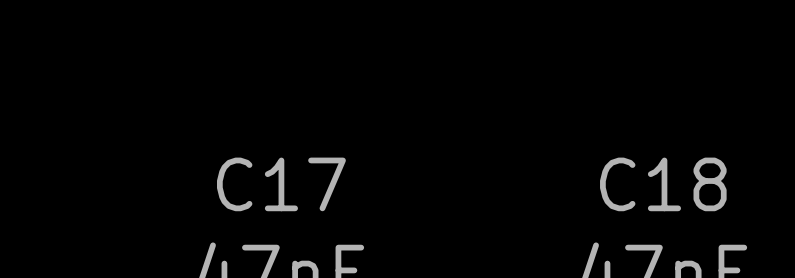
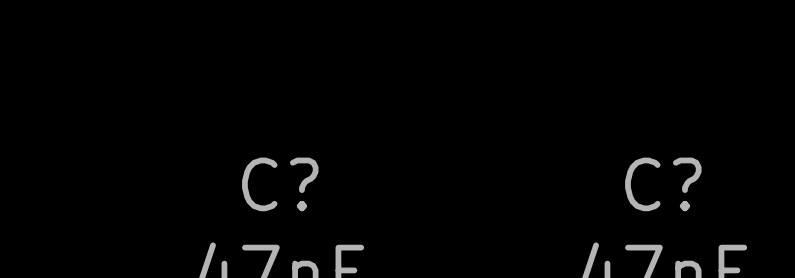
C17 name: C17 (281, 184) -> C? (280, 184)
C18 name: C18 (663, 184) -> C? (663, 184)

